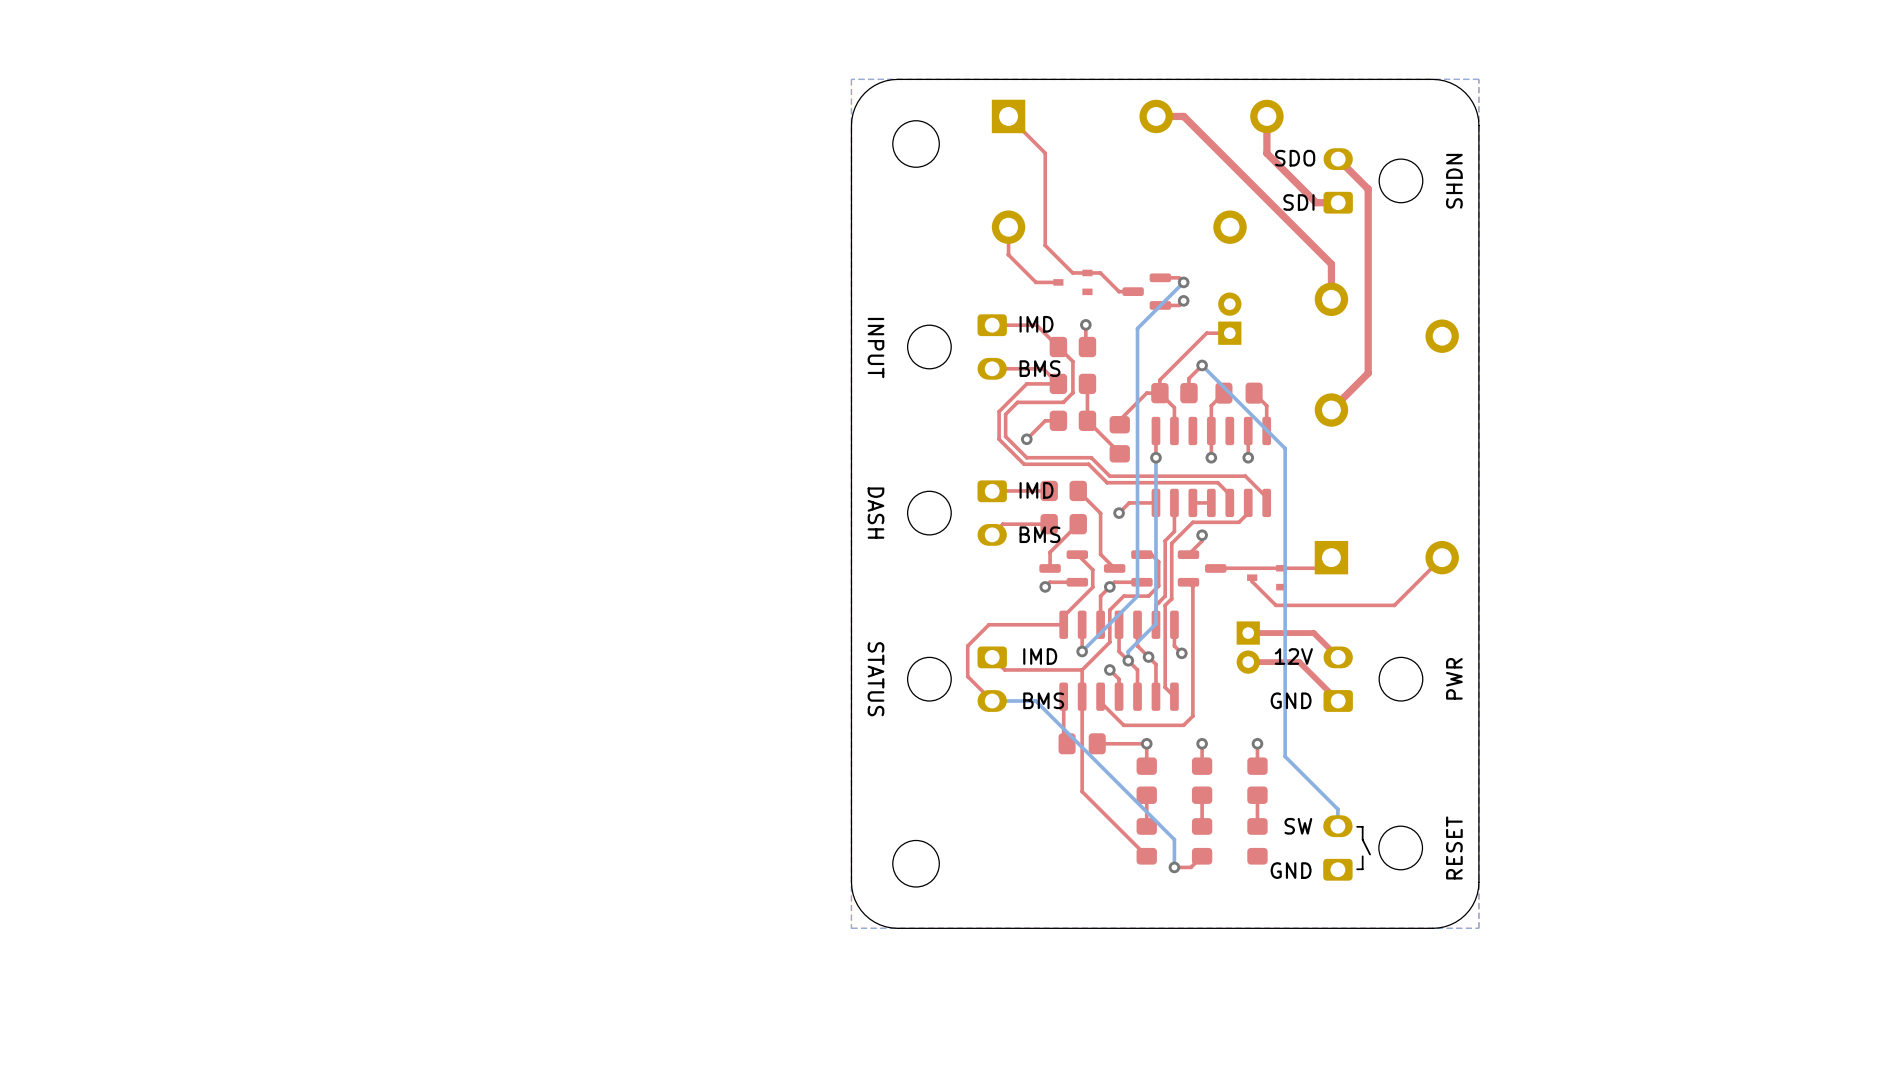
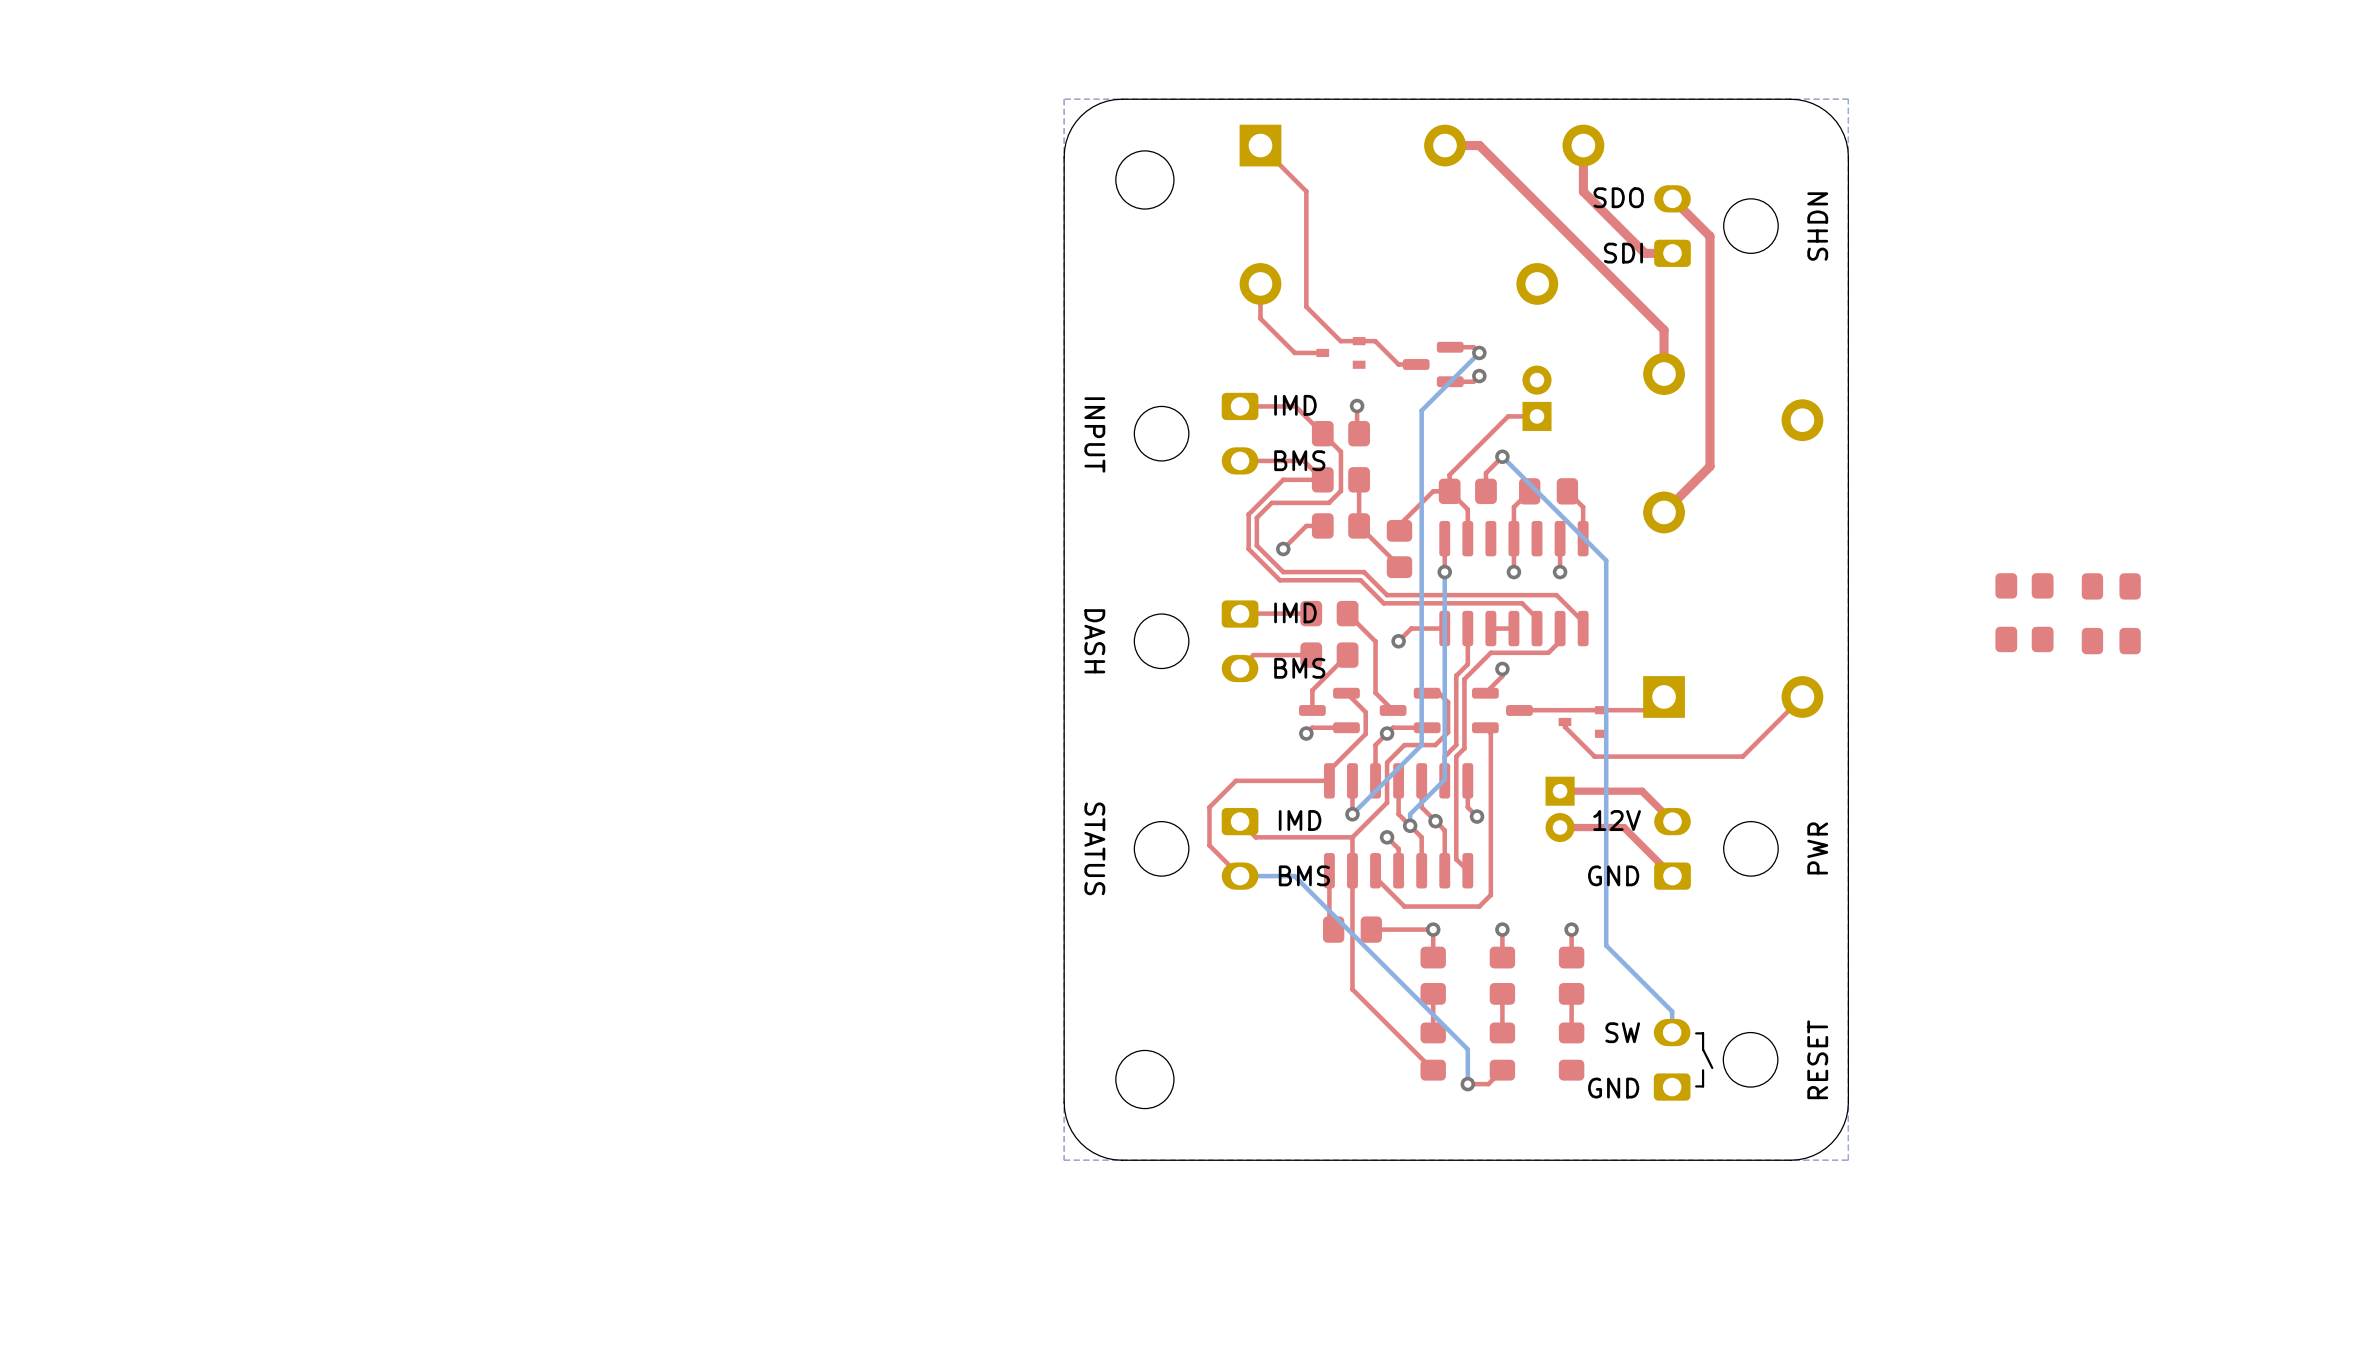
part: none -> (2024, 585)
part: none -> (2111, 586)
part: none -> (2024, 639)
part: none -> (2111, 641)

